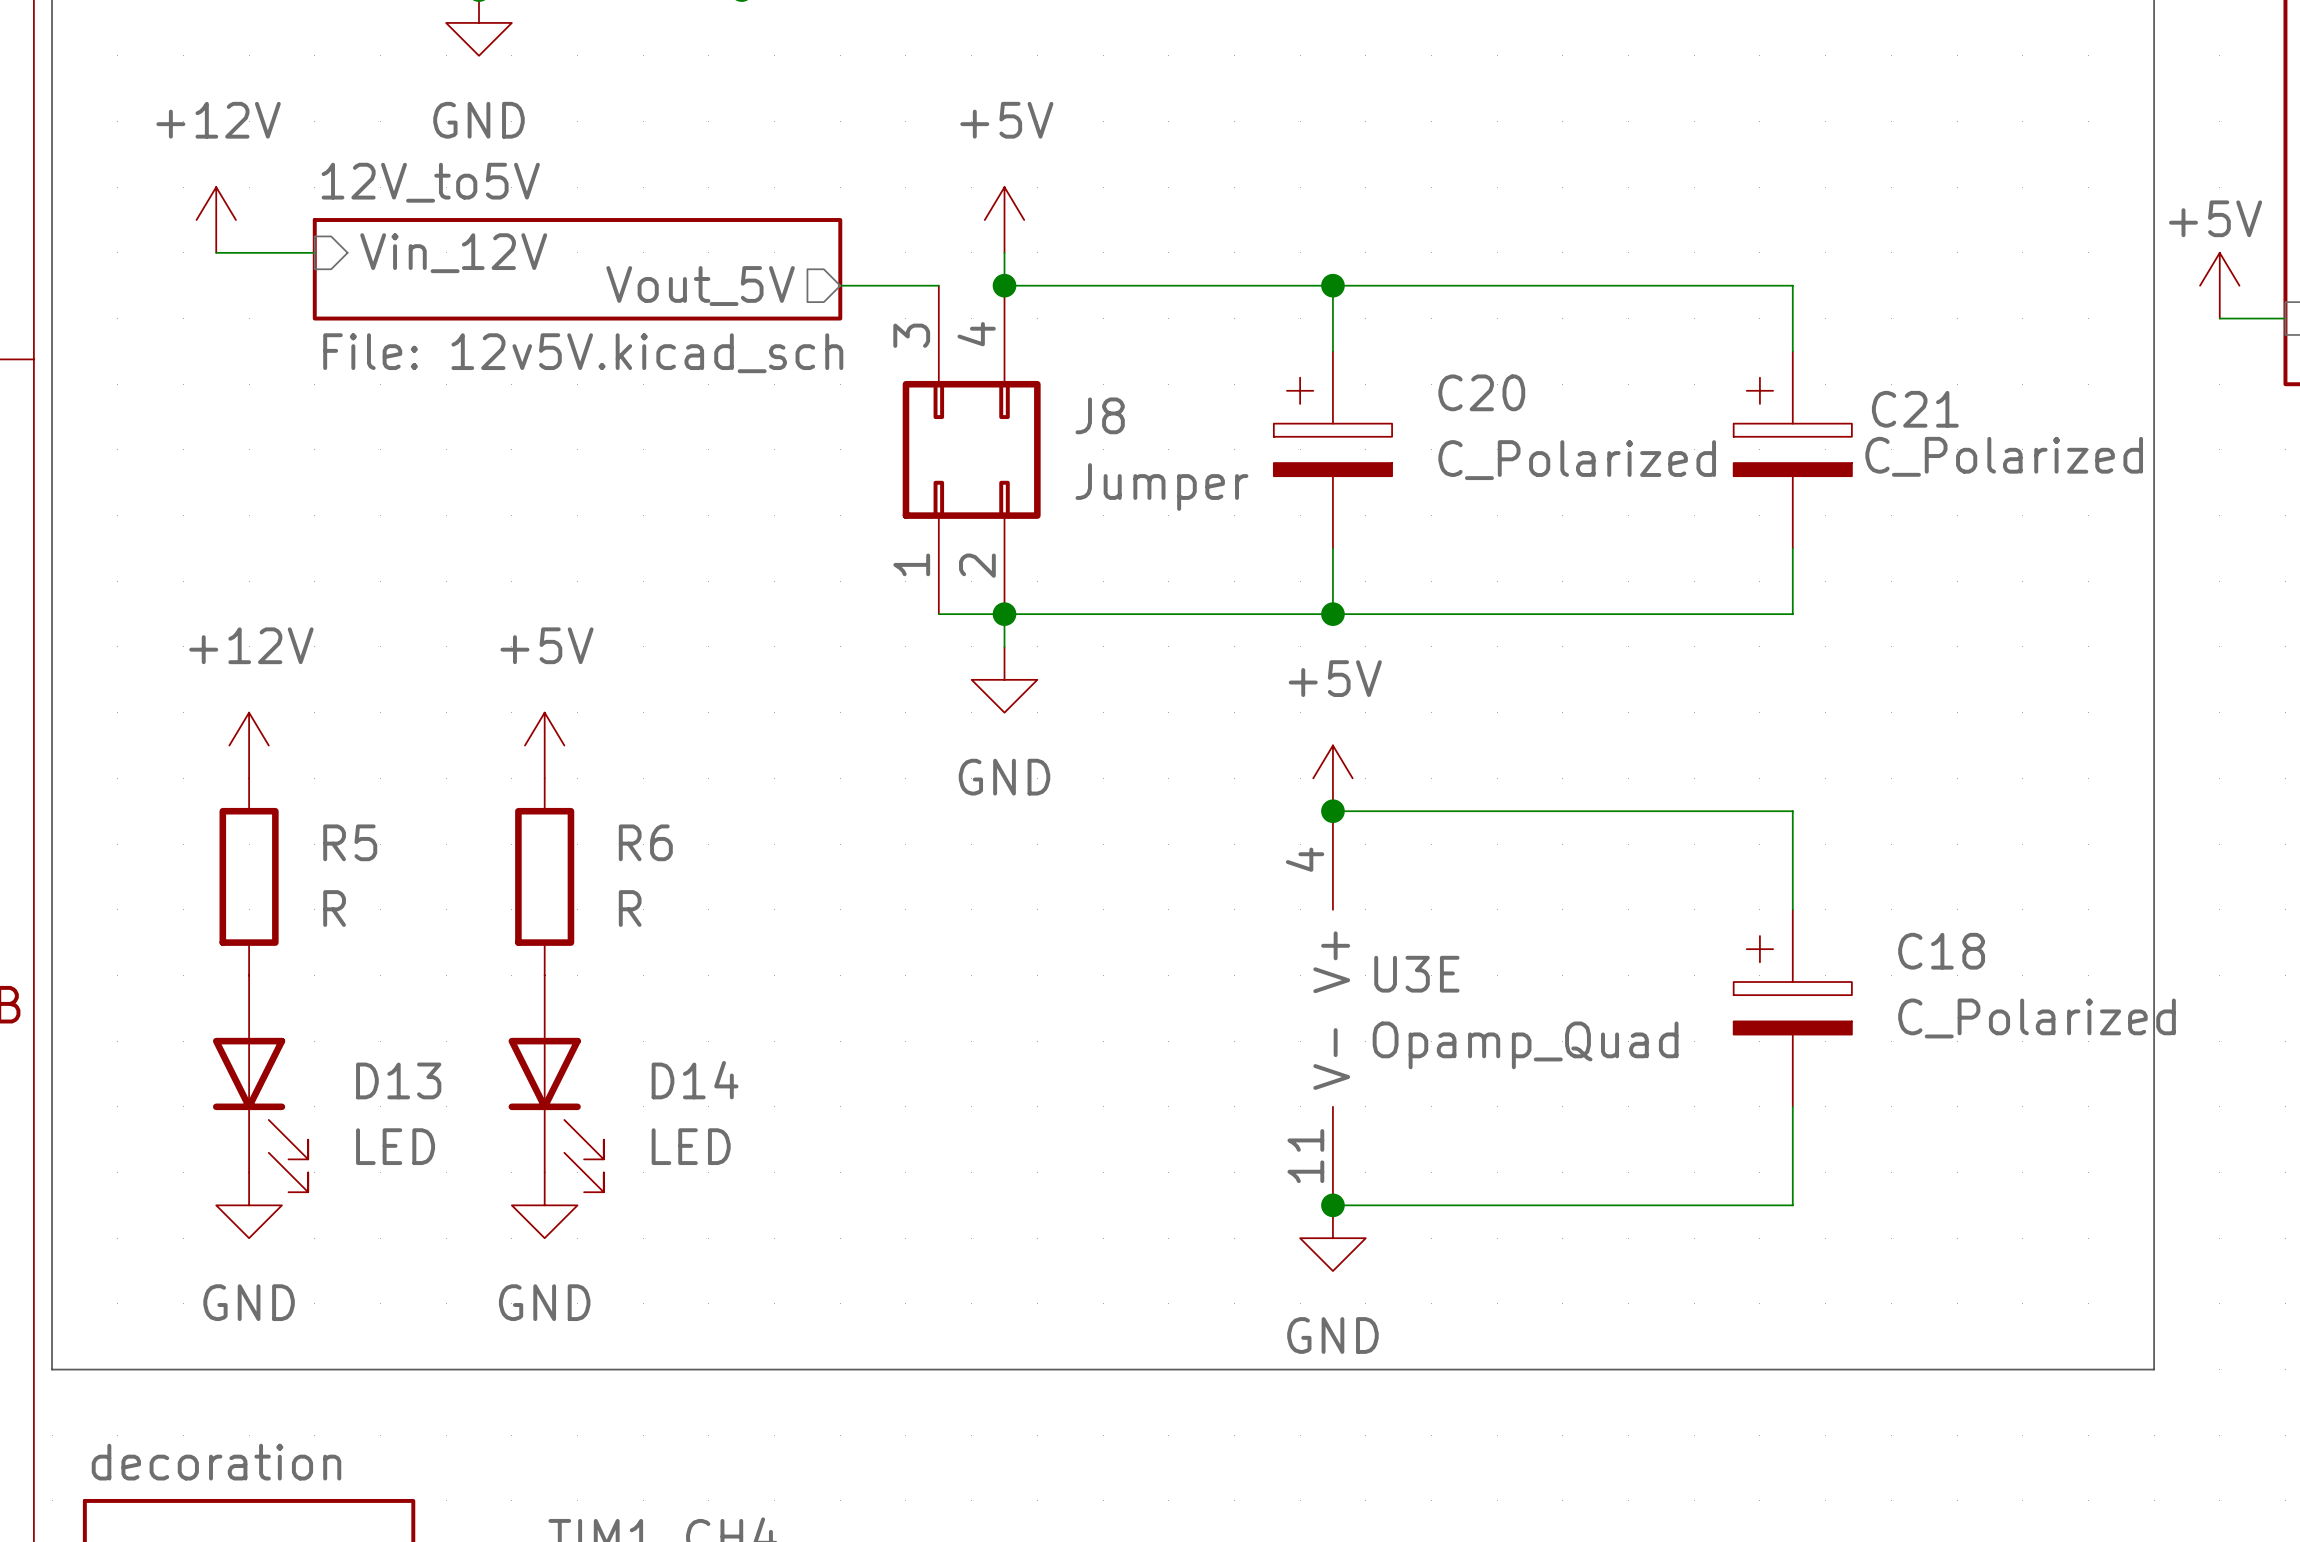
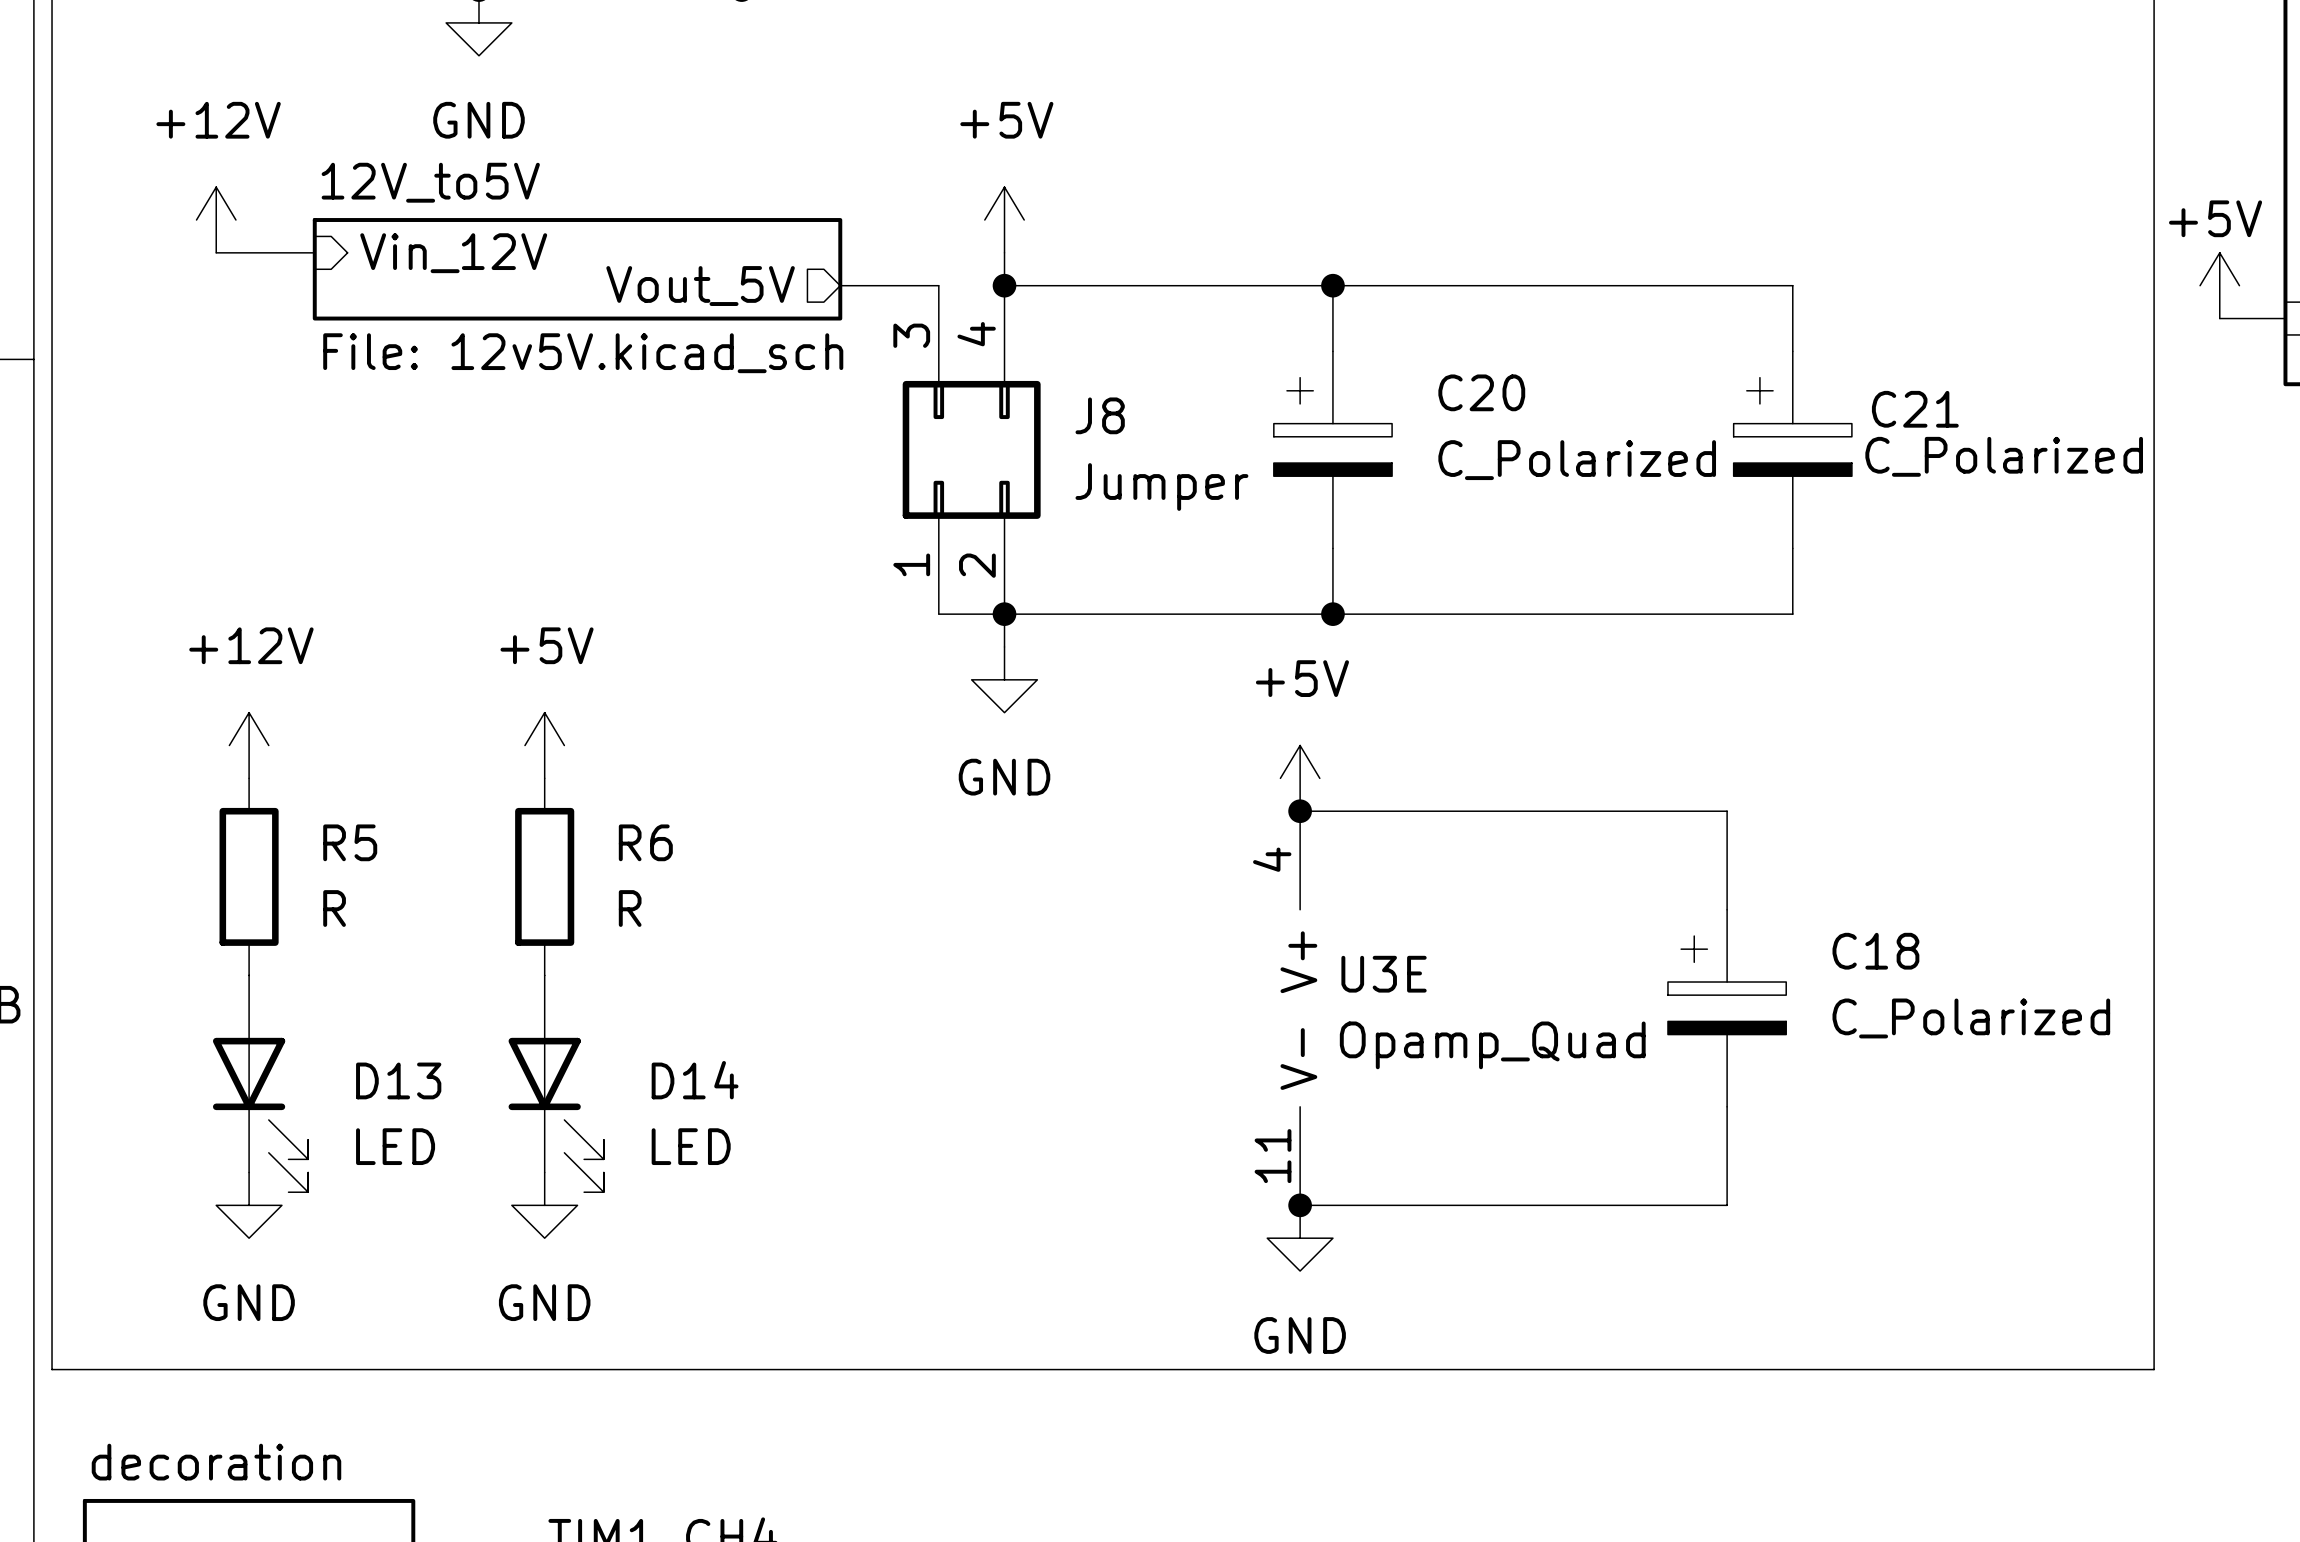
power symbol position: +5V (1332, 778) -> +5V (1300, 778)
wire: none -> (1300, 811) (1332, 811)
junction position: (1332, 811) -> (1300, 811)
wire: (1727, 811) (1792, 811) (1792, 909) -> (1727, 811) (1727, 909)
U3E position: (1332, 1008) -> (1300, 1008)
C18 position: (1792, 1008) -> (1727, 1008)
wire: (1792, 1106) (1792, 1205) (1727, 1205) -> (1727, 1106) (1727, 1205)
wire: none -> (1300, 1205) (1332, 1205)
junction position: (1332, 1205) -> (1300, 1205)
power symbol position: GND (1332, 1238) -> GND (1300, 1238)

